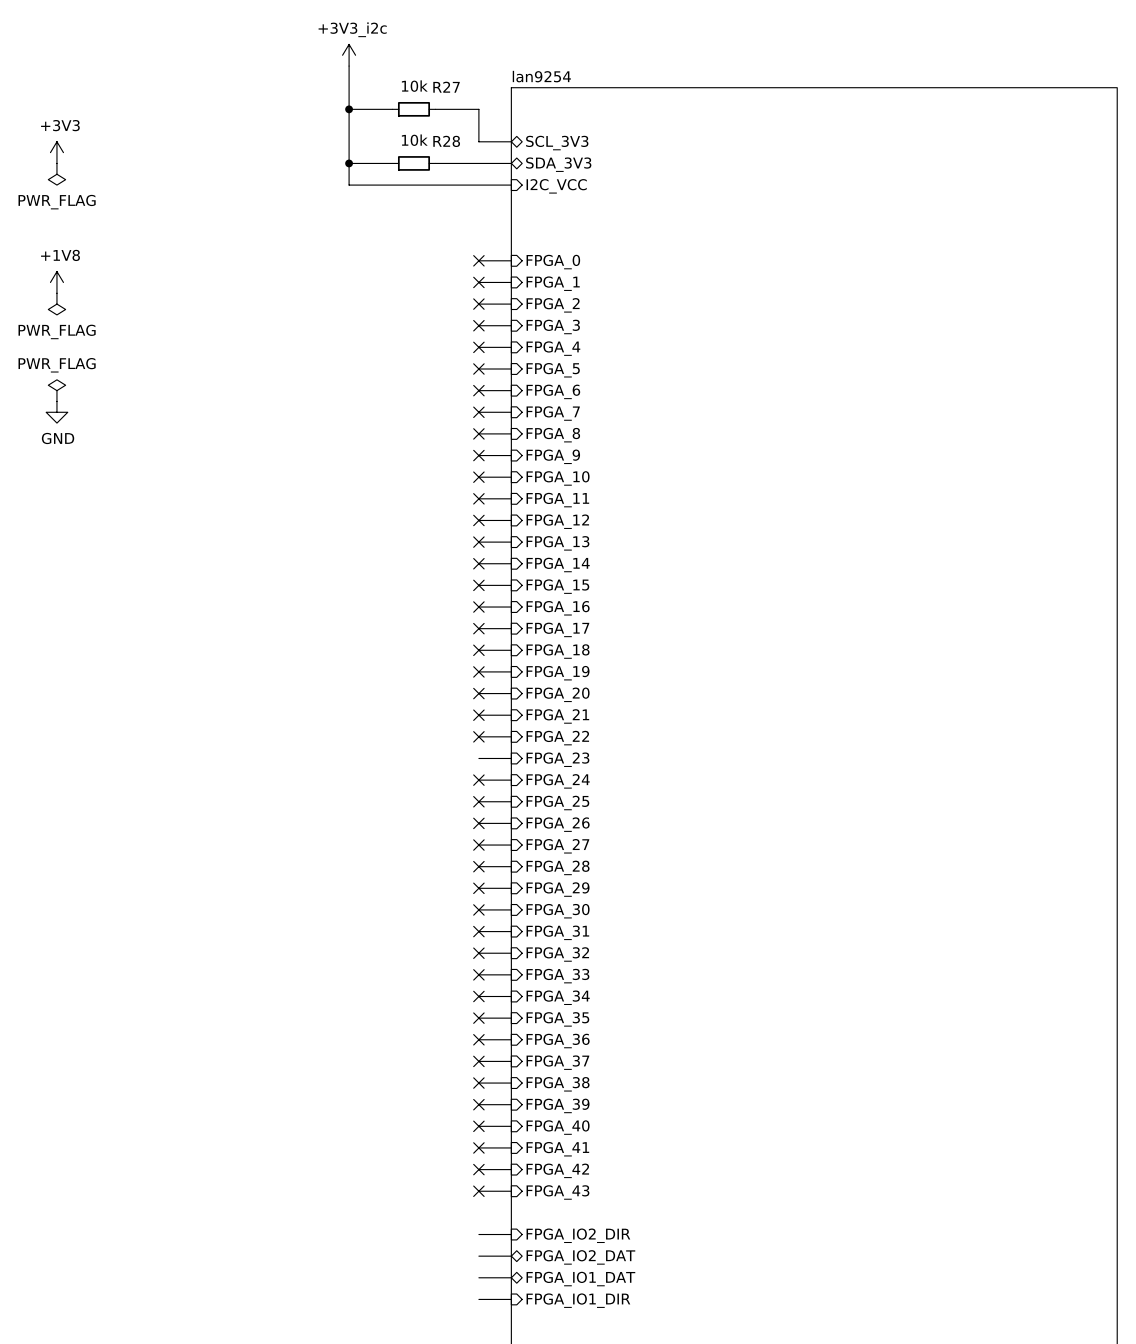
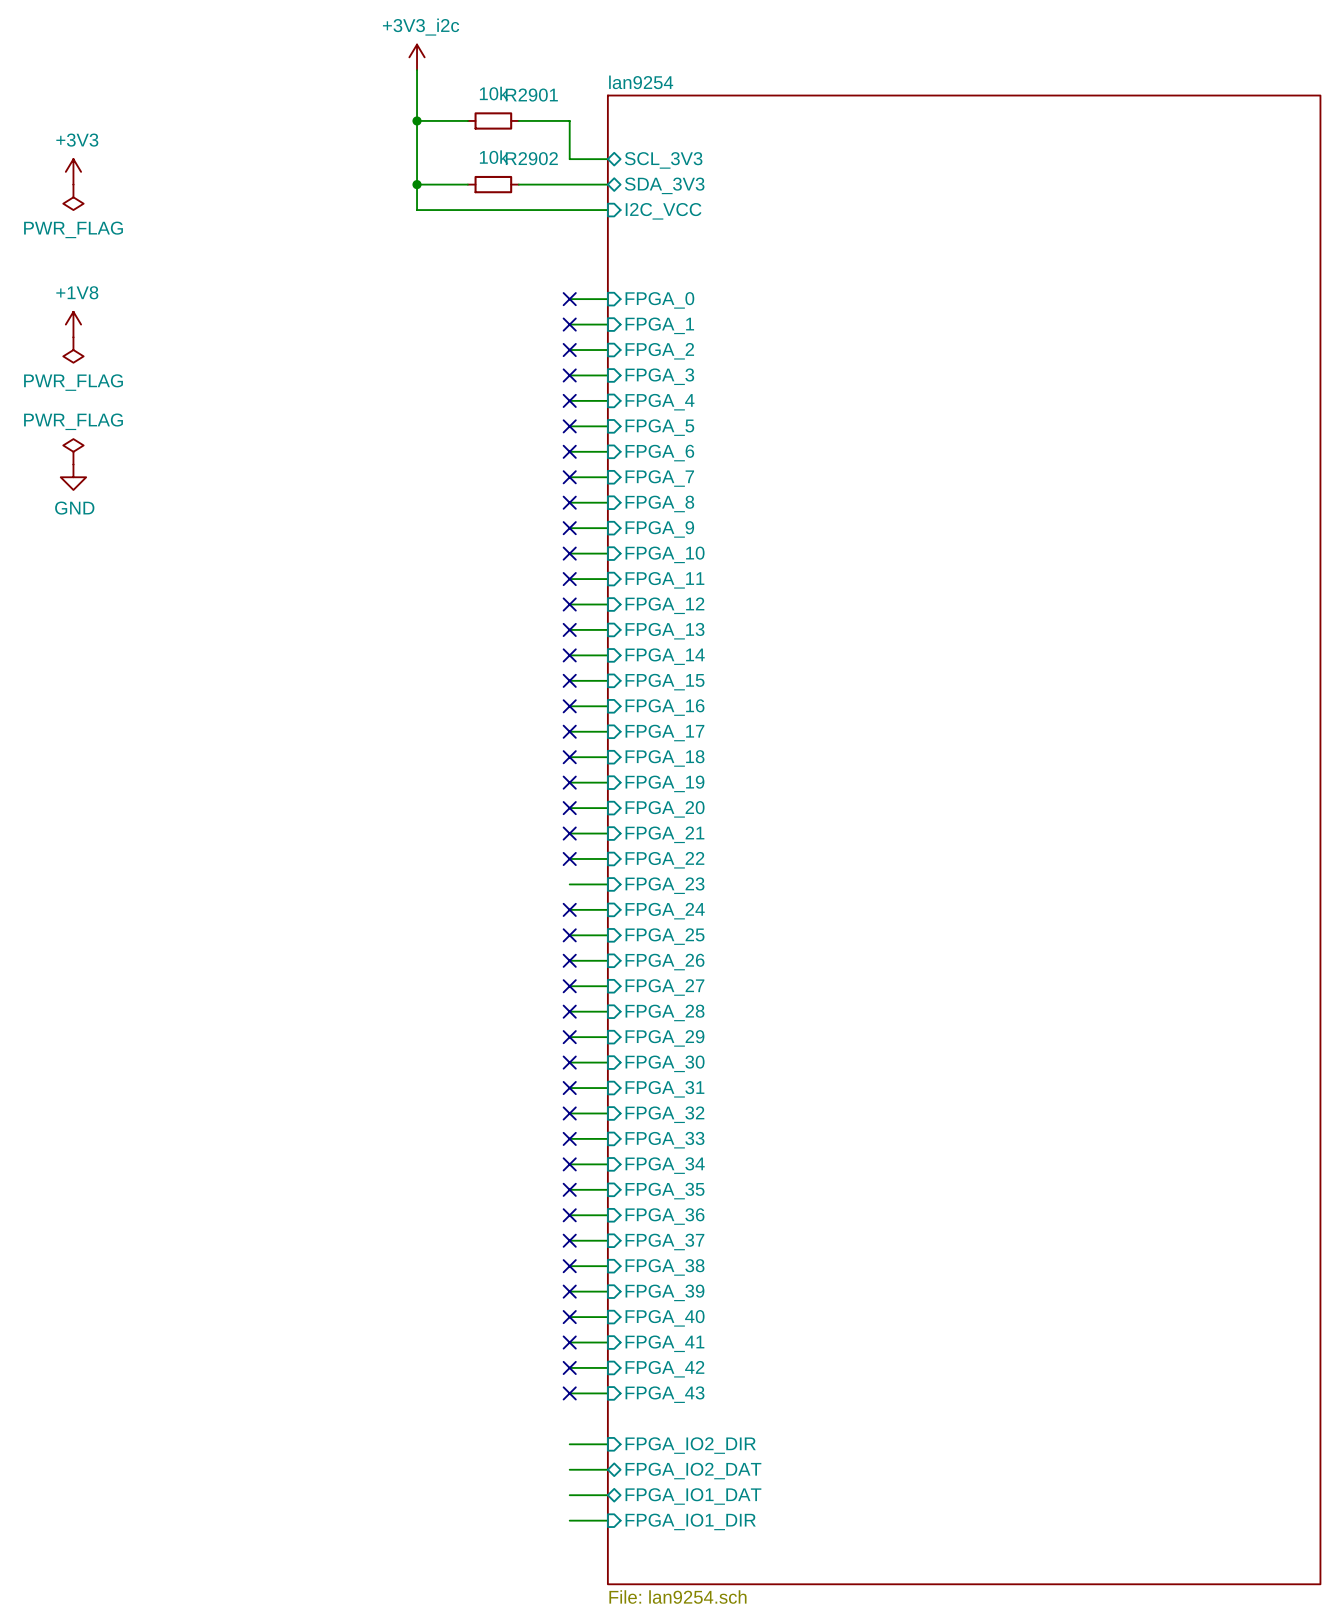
R27 name: R27 (446, 87) -> R2901 (531, 95)
R28 name: R28 (446, 141) -> R2902 (531, 158)

